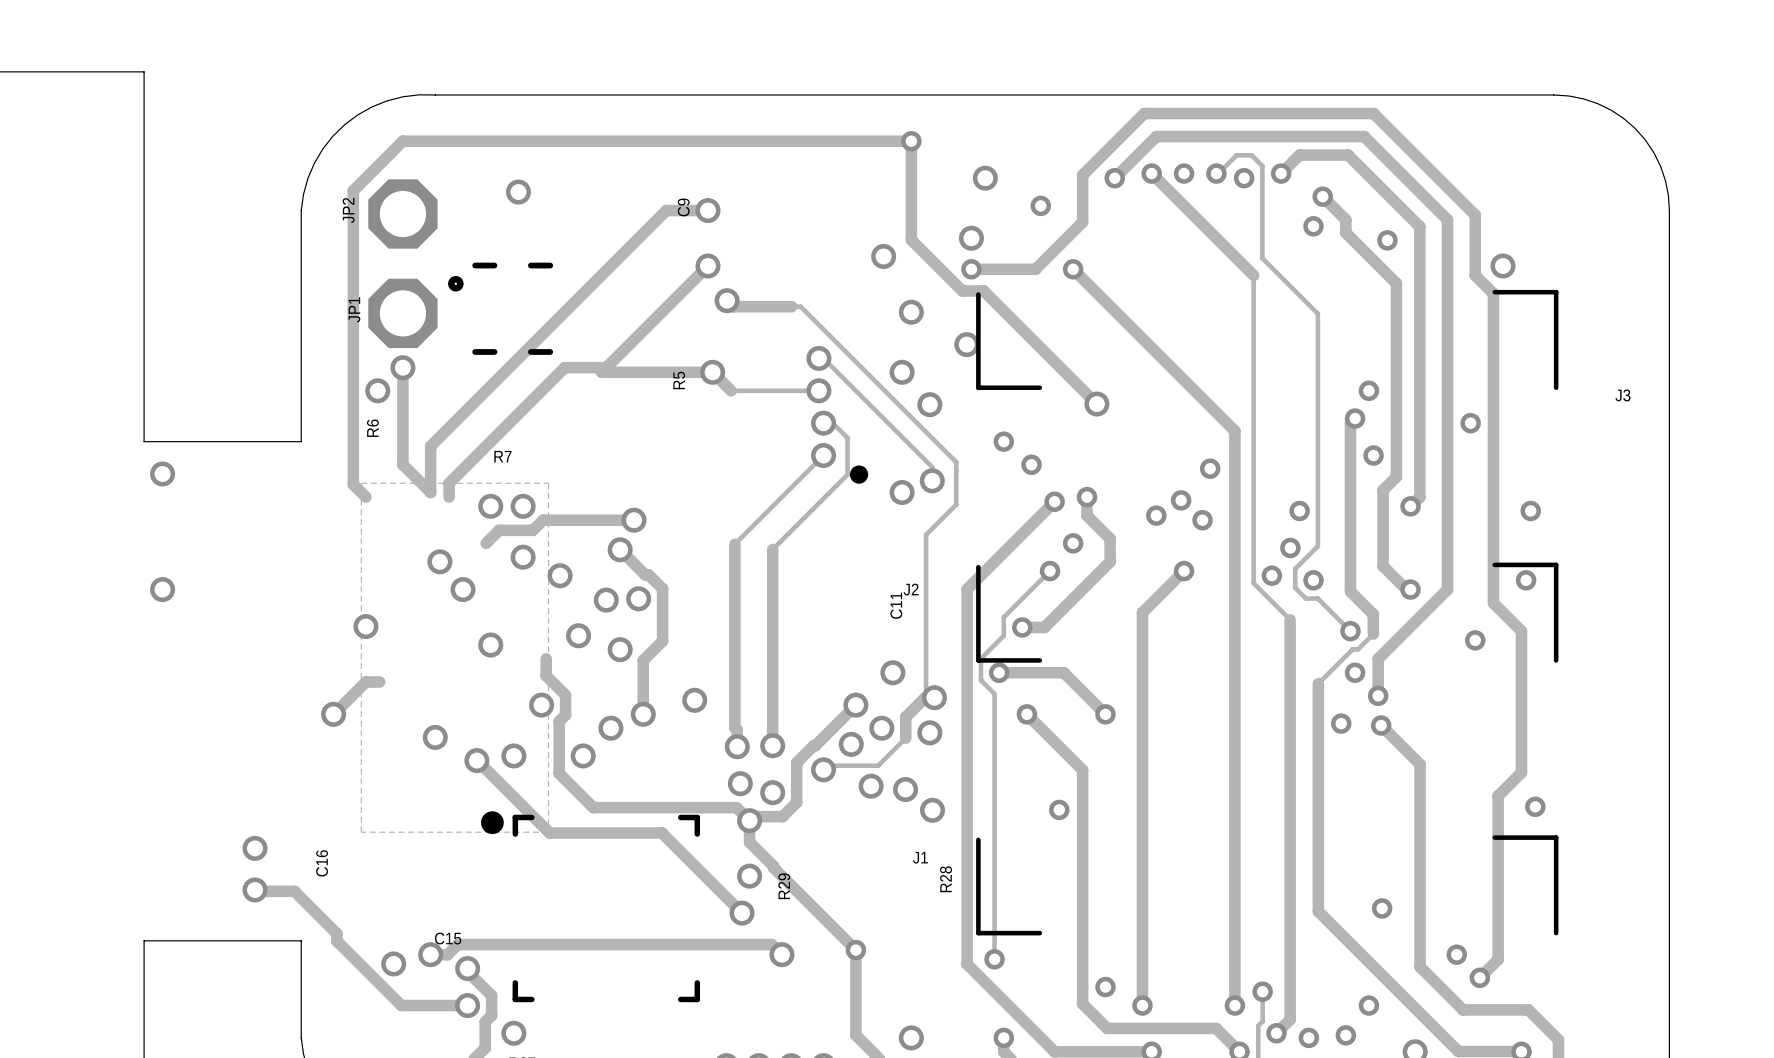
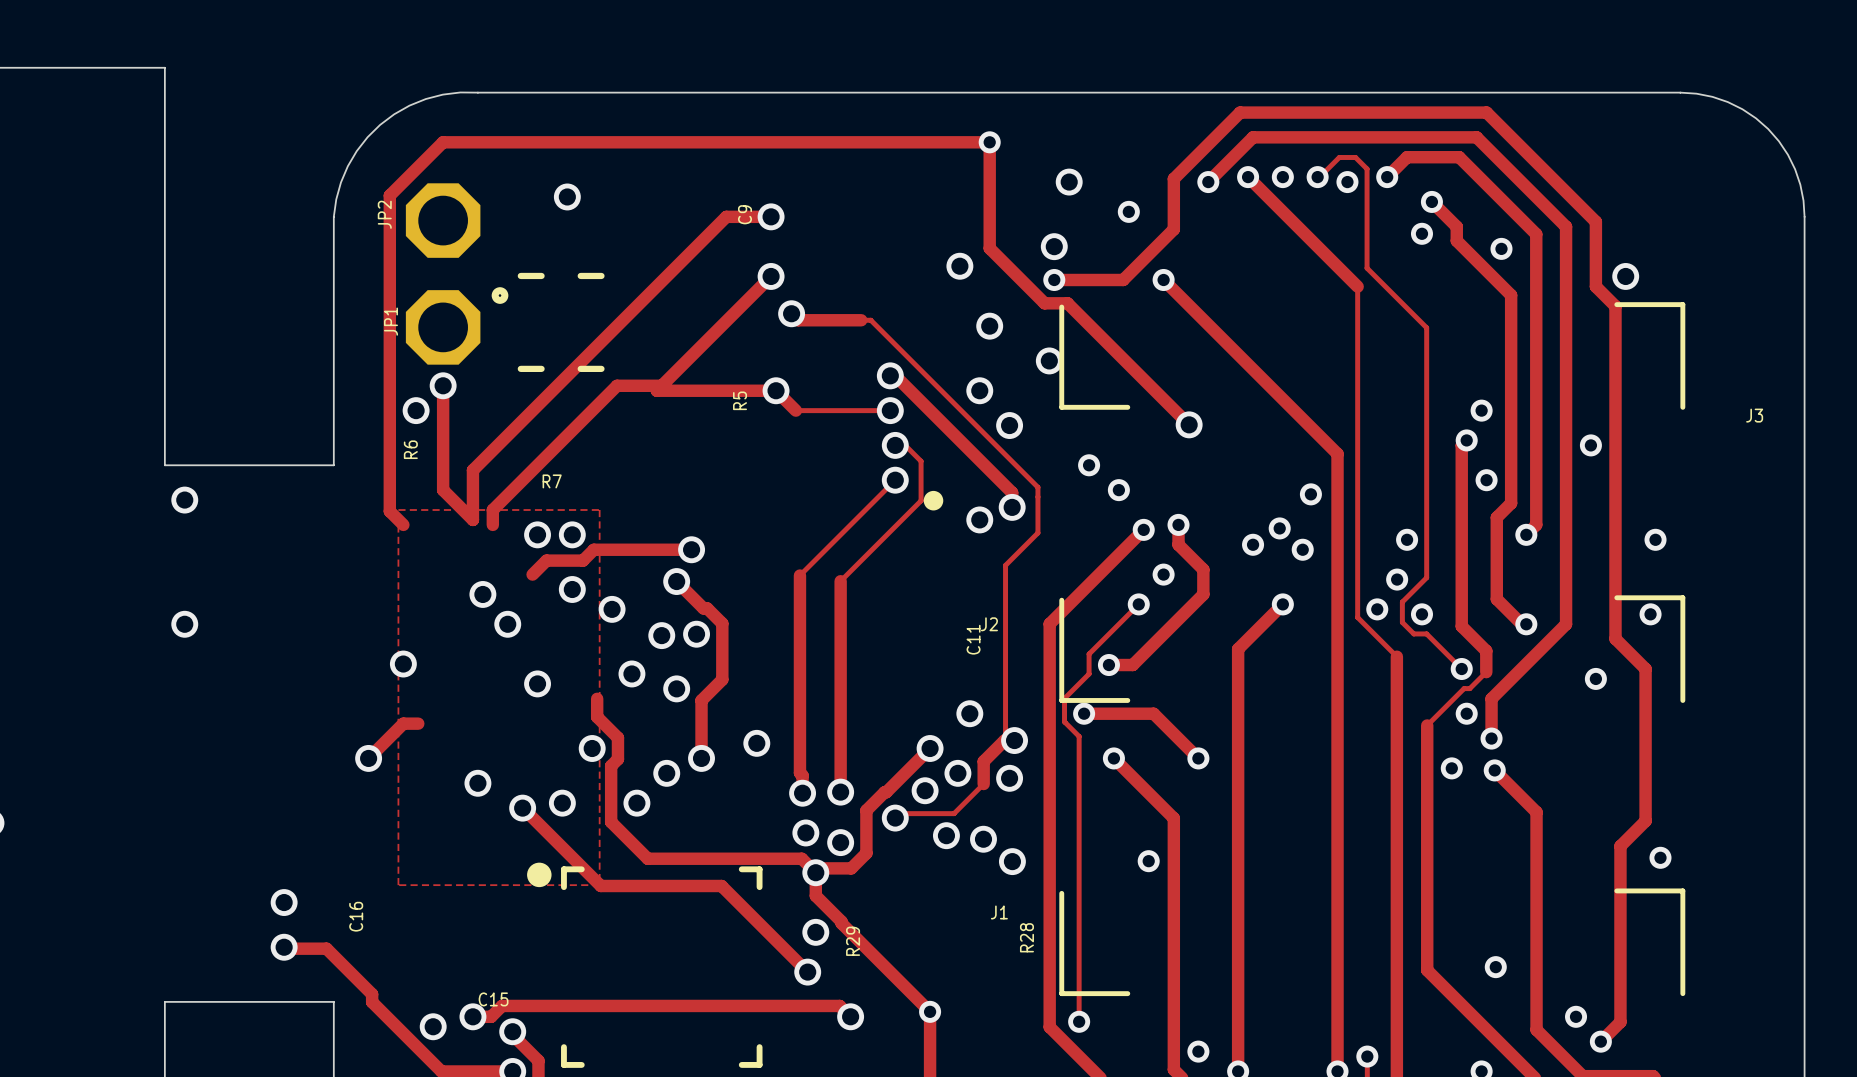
track width: thin (818, 358) (823, 358) (932, 467) (932, 480) -> thick (890, 375) (895, 375) (1012, 492) (1012, 507)

